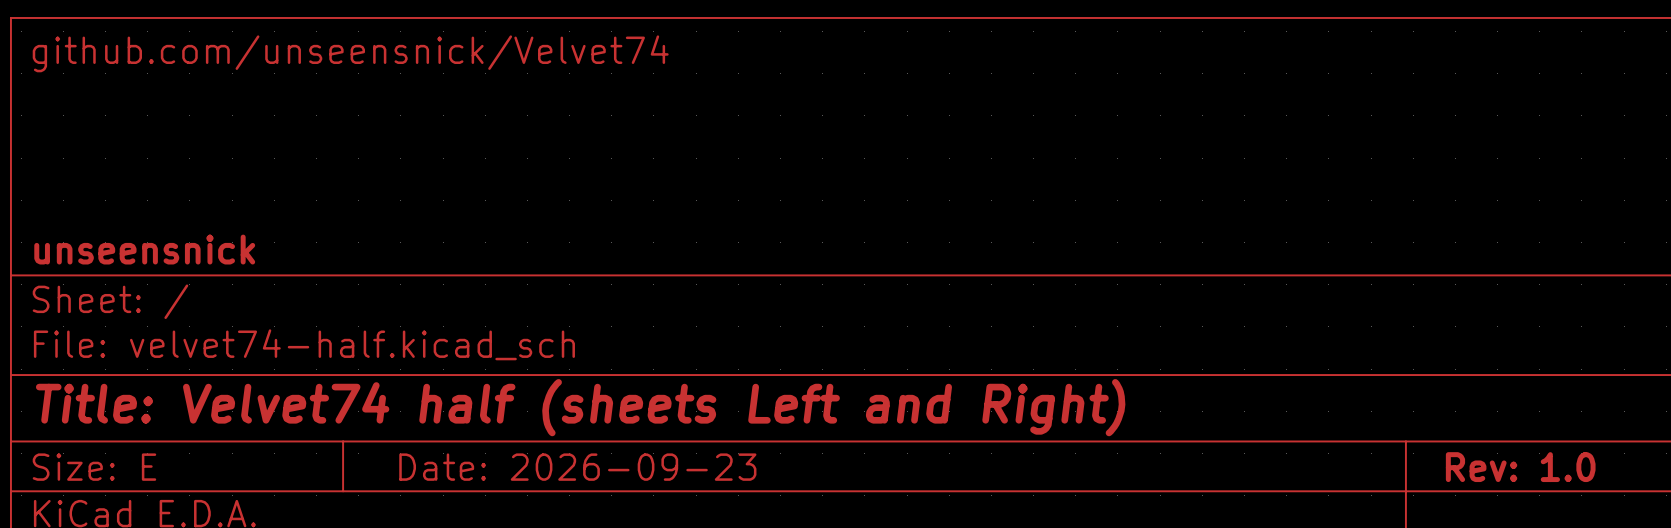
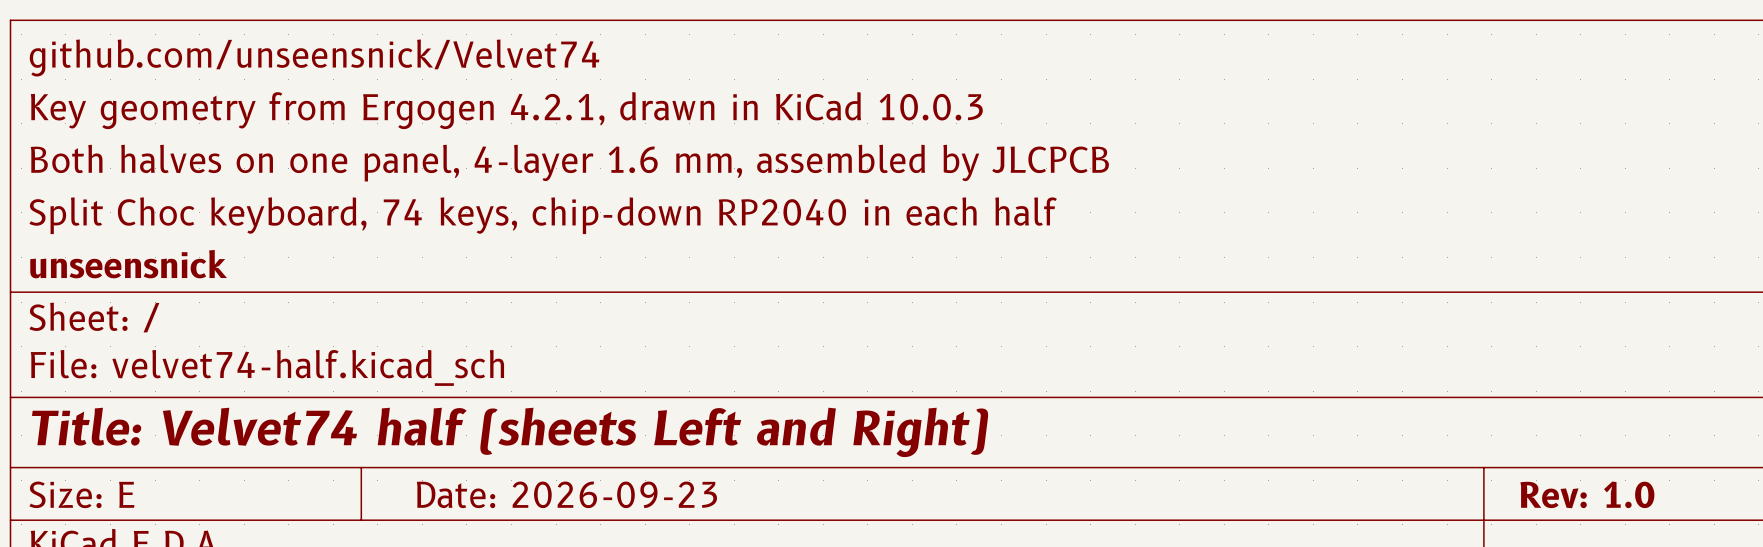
title block: none -> Key geometry from Ergogen 4.2.1, drawn in KiCad 10.0.3 (506, 110)
title block: none -> Both halves on one panel, 4-layer 1.6 mm, assembled by JLCPCB (569, 163)
title block: none -> Split Choc keyboard, 74 keys, chip-down RP2040 in each half (543, 215)

